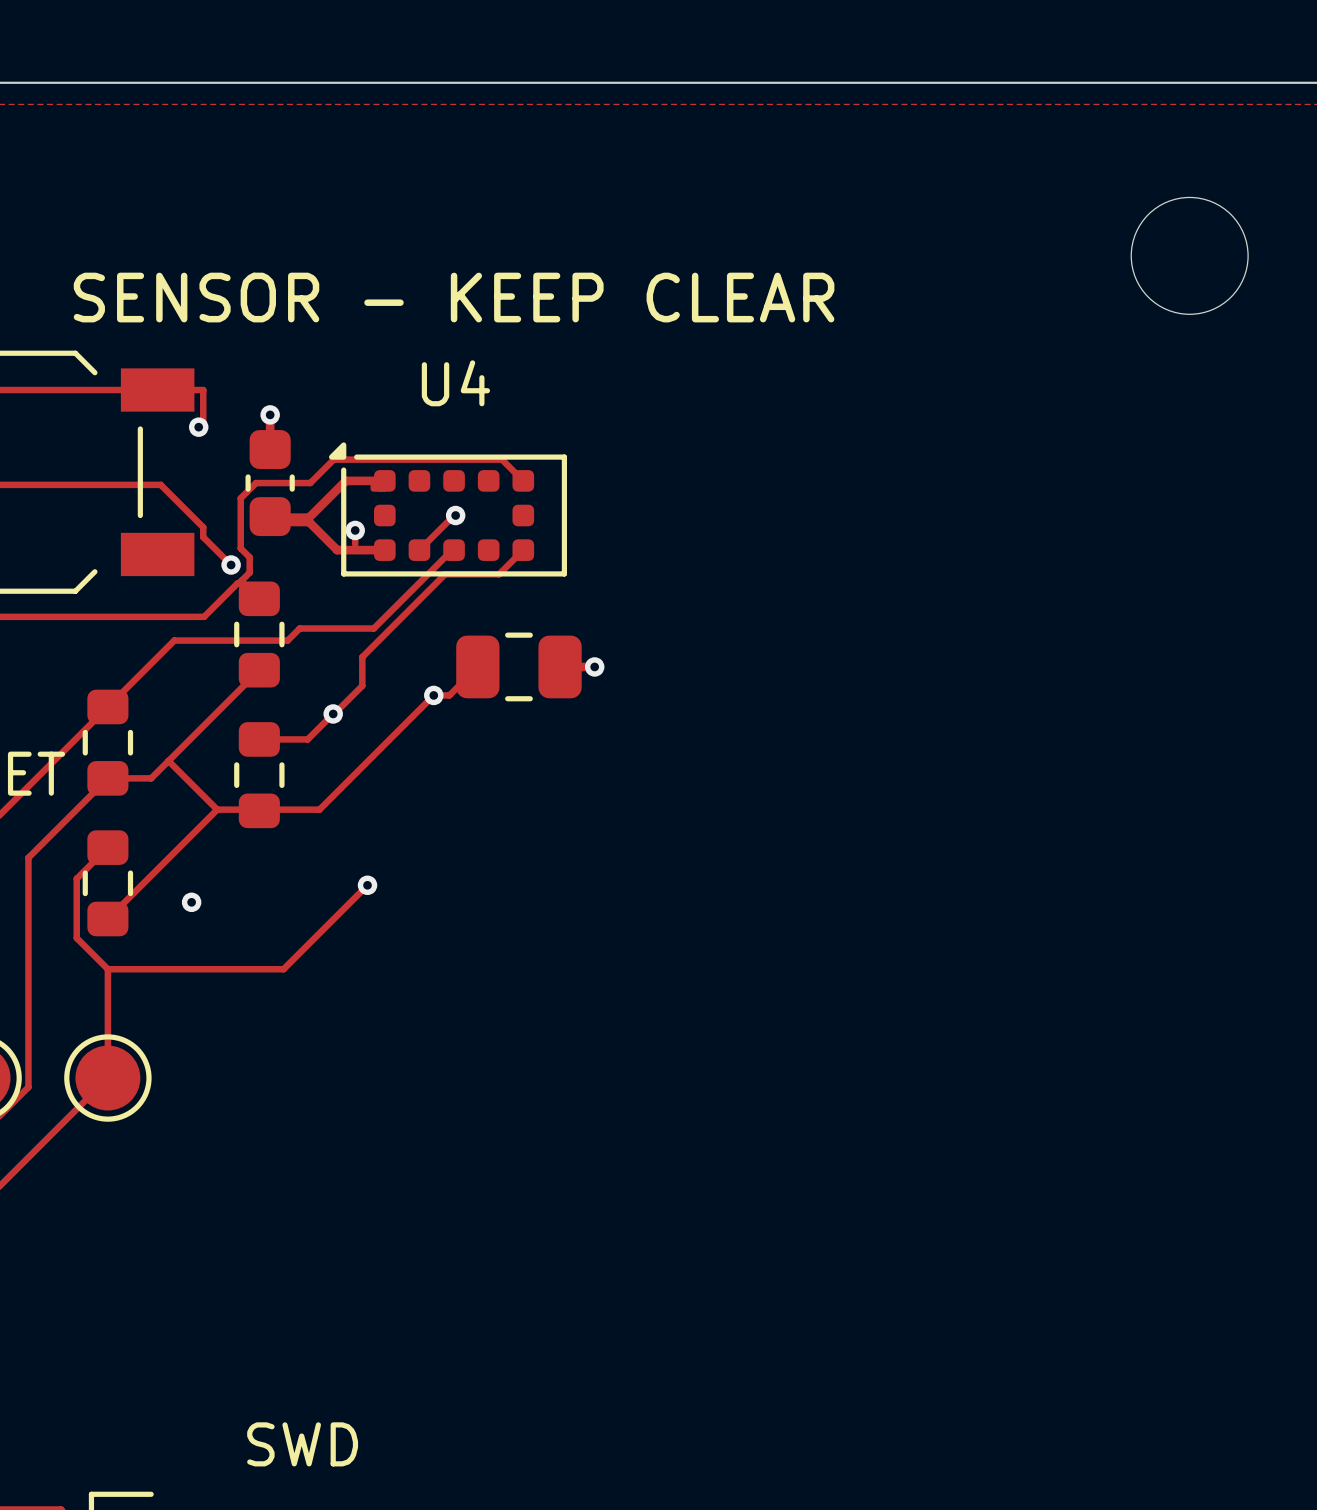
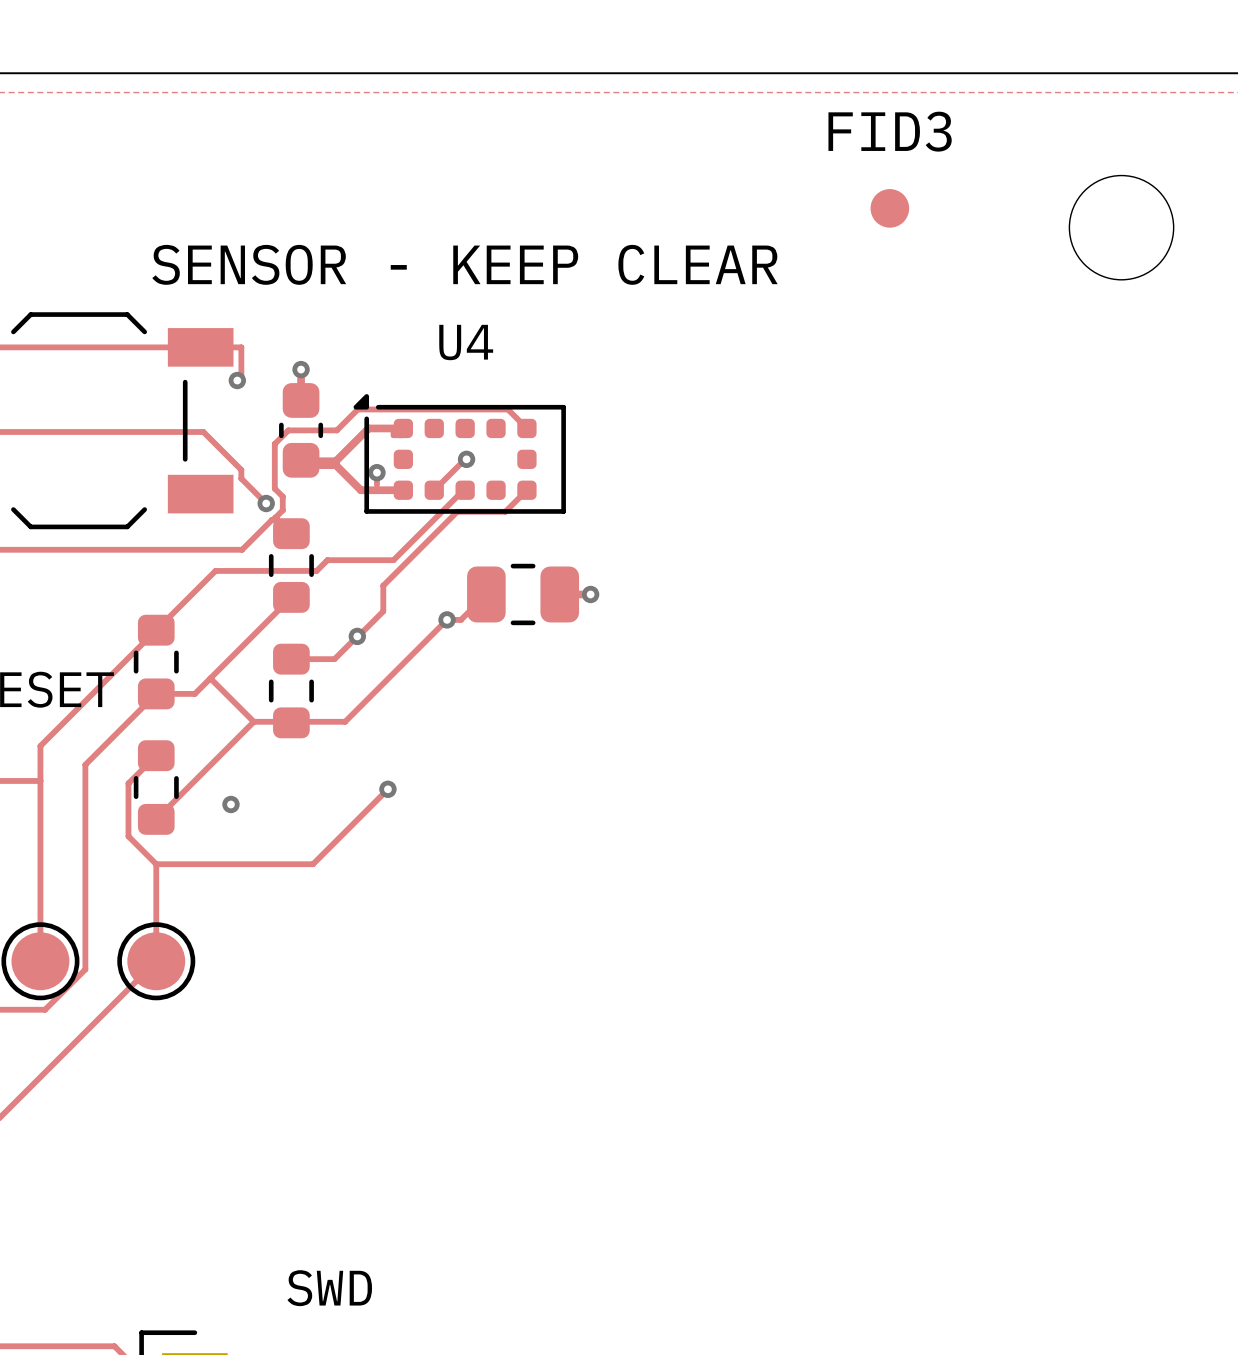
FID3: none -> (889, 208)

